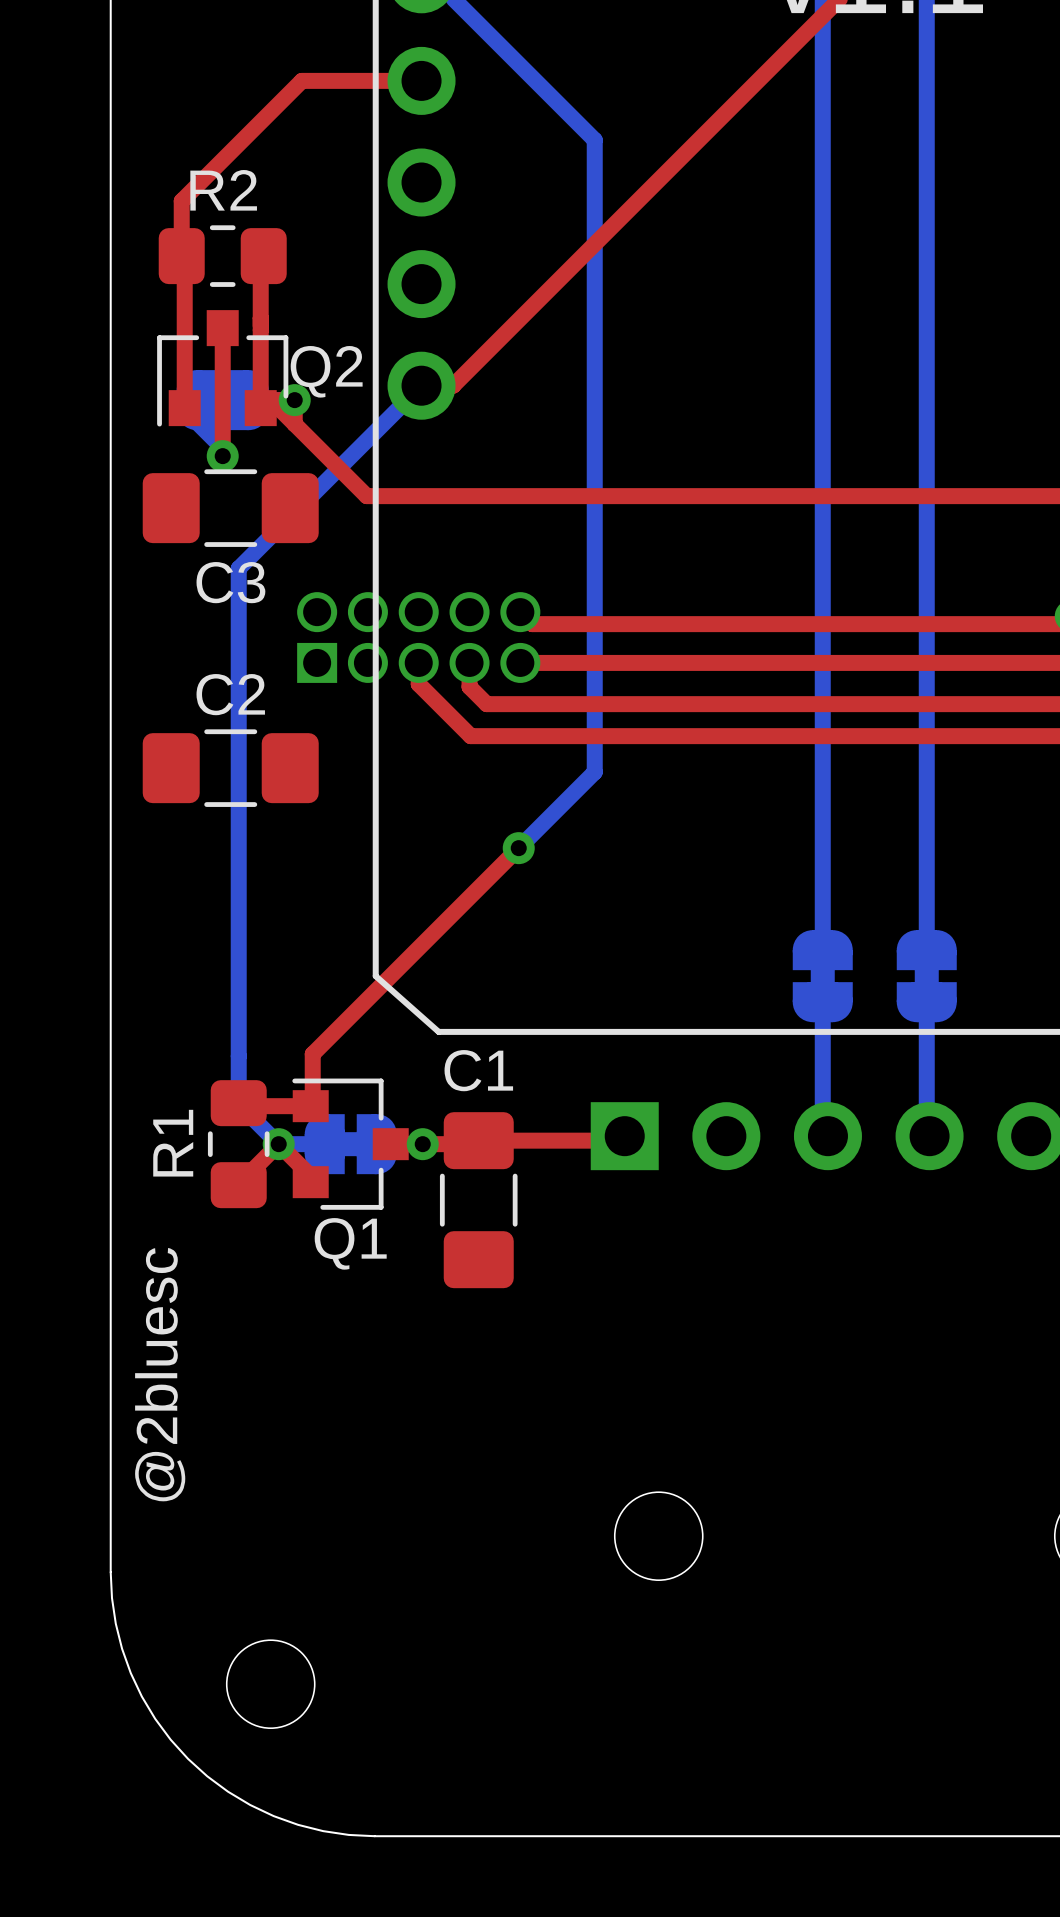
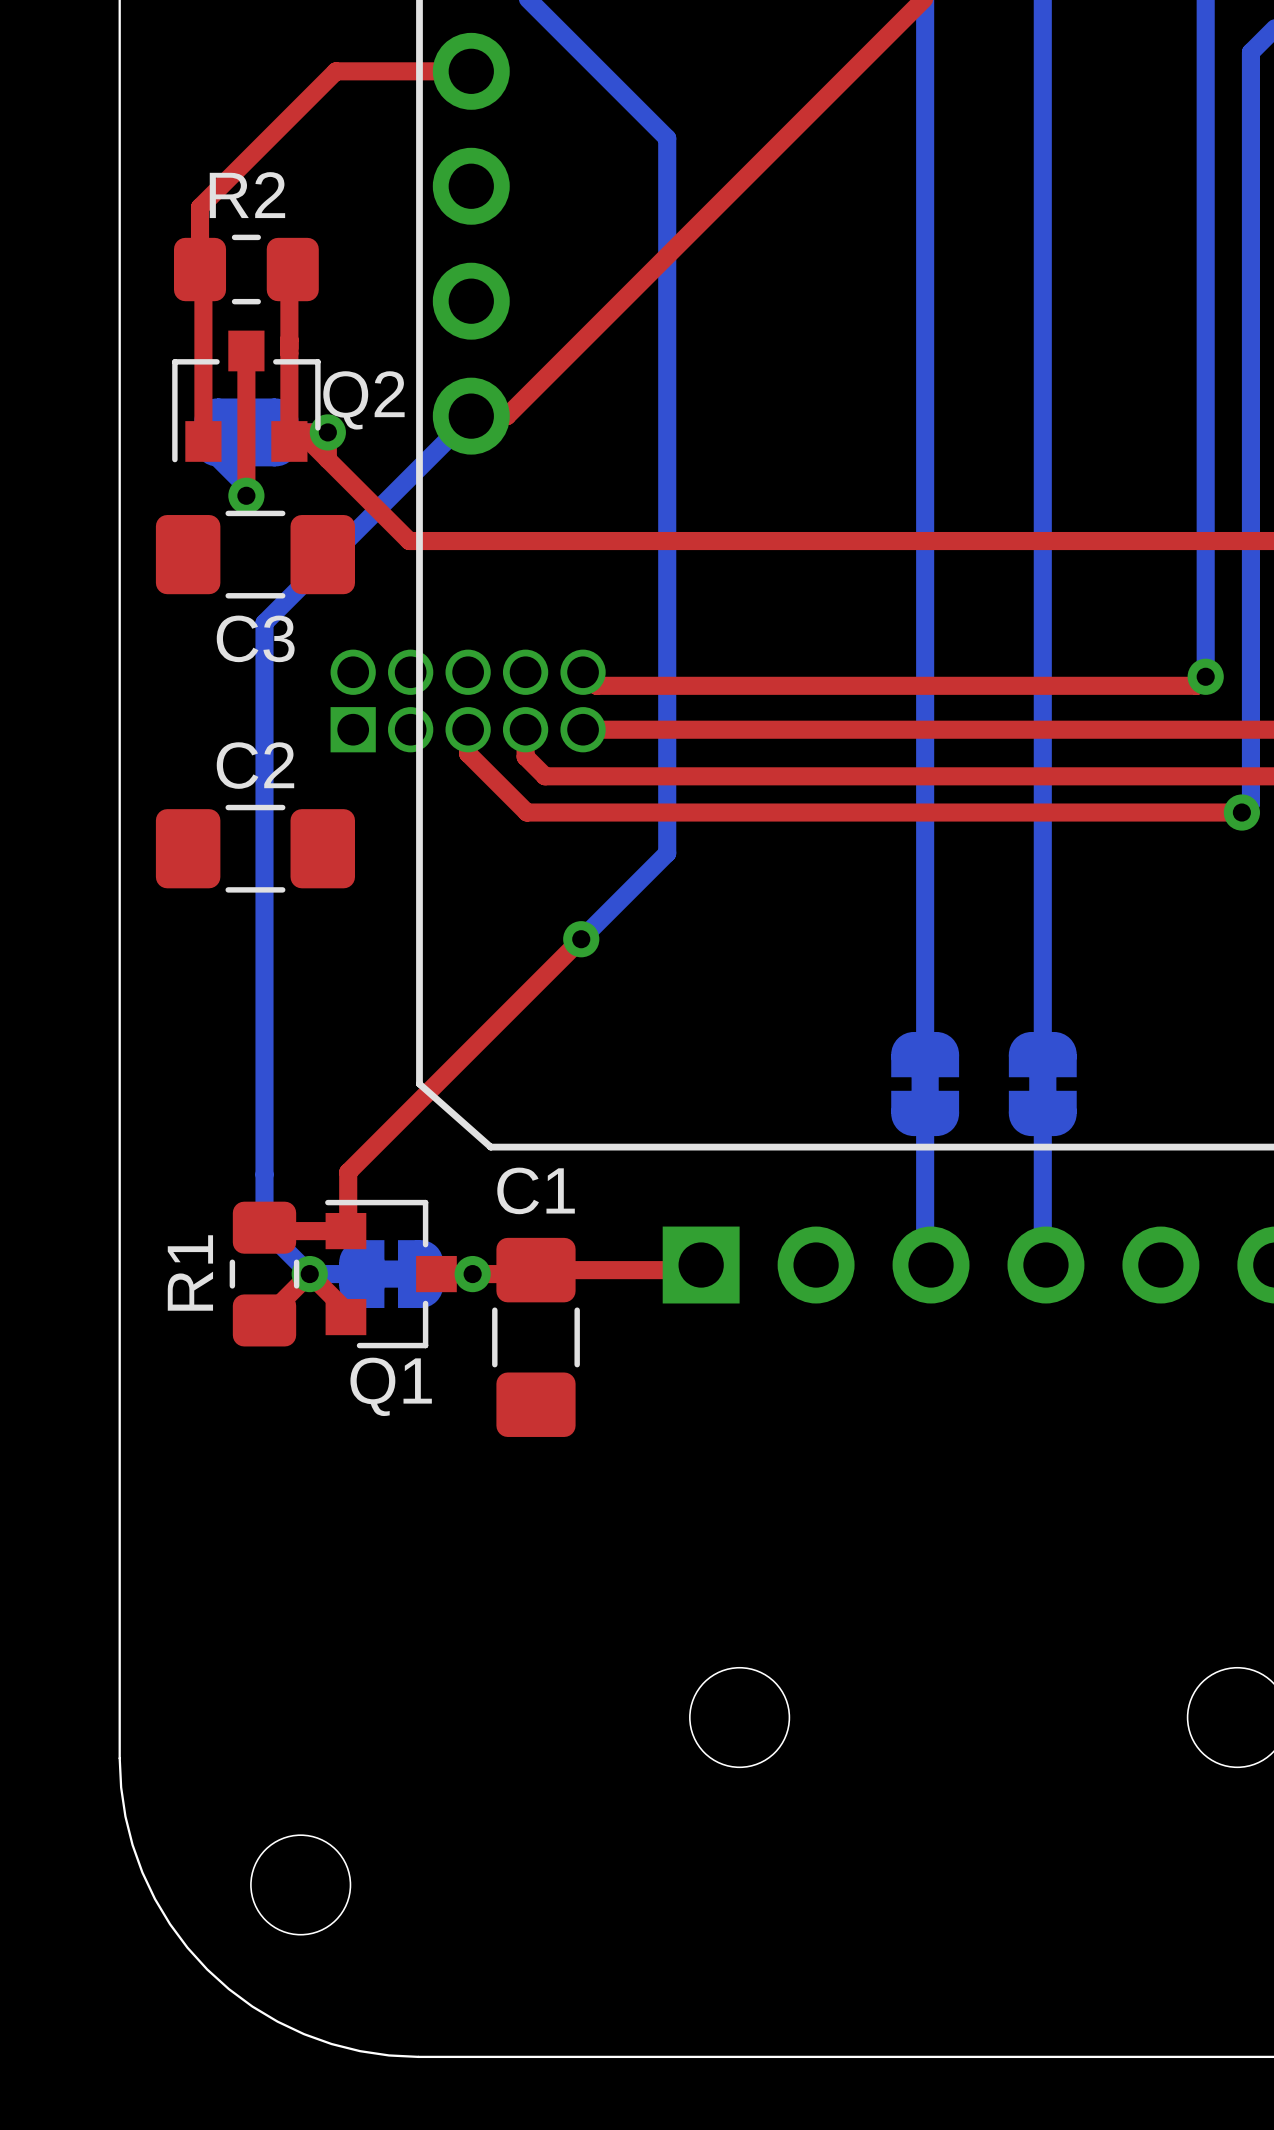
text: @2bluesc (160, 1374) -> none

